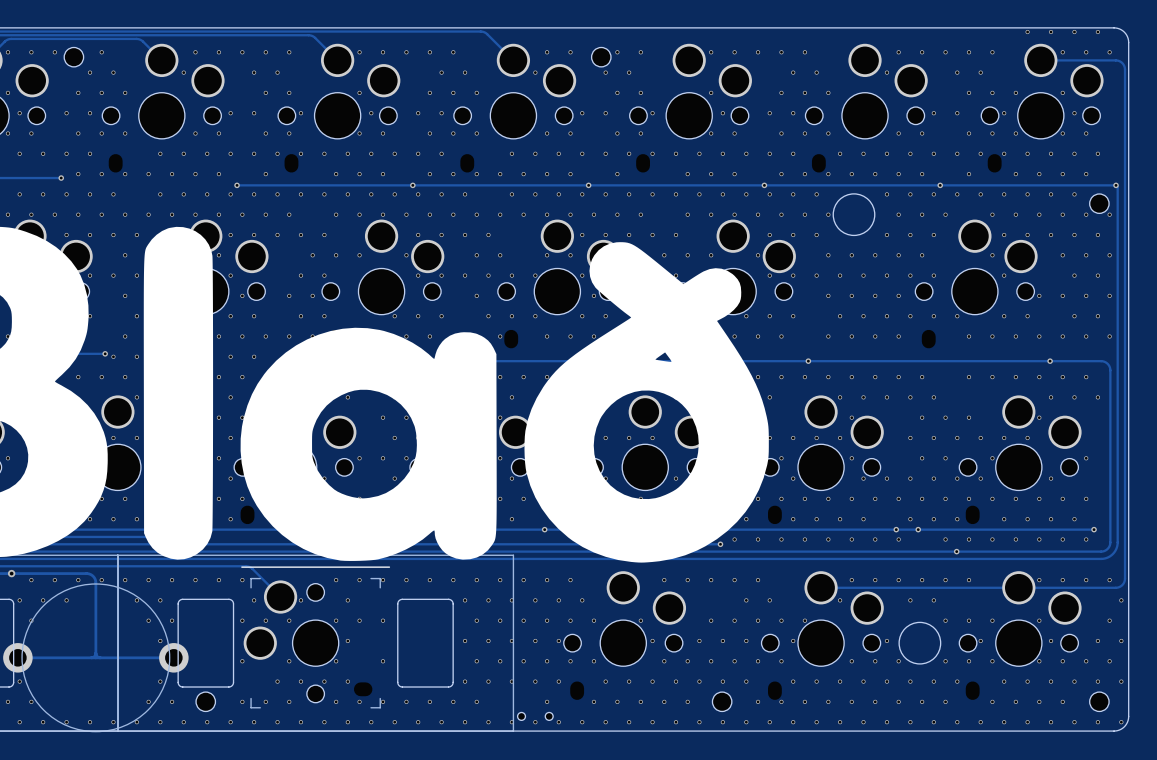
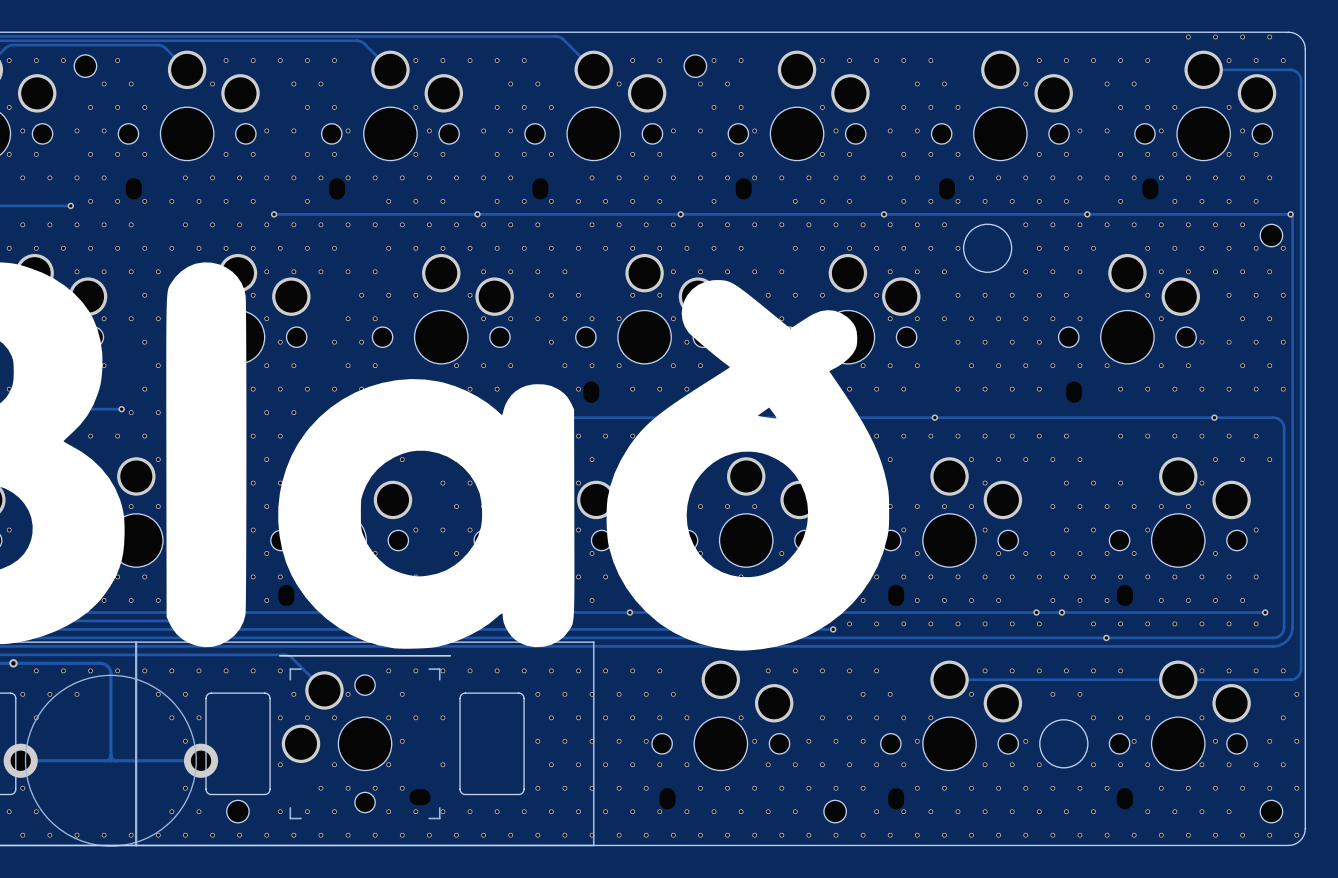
via: none -> (578, 811)
via: none -> (605, 811)
via: none -> (659, 811)
part: (535, 716) -> none

